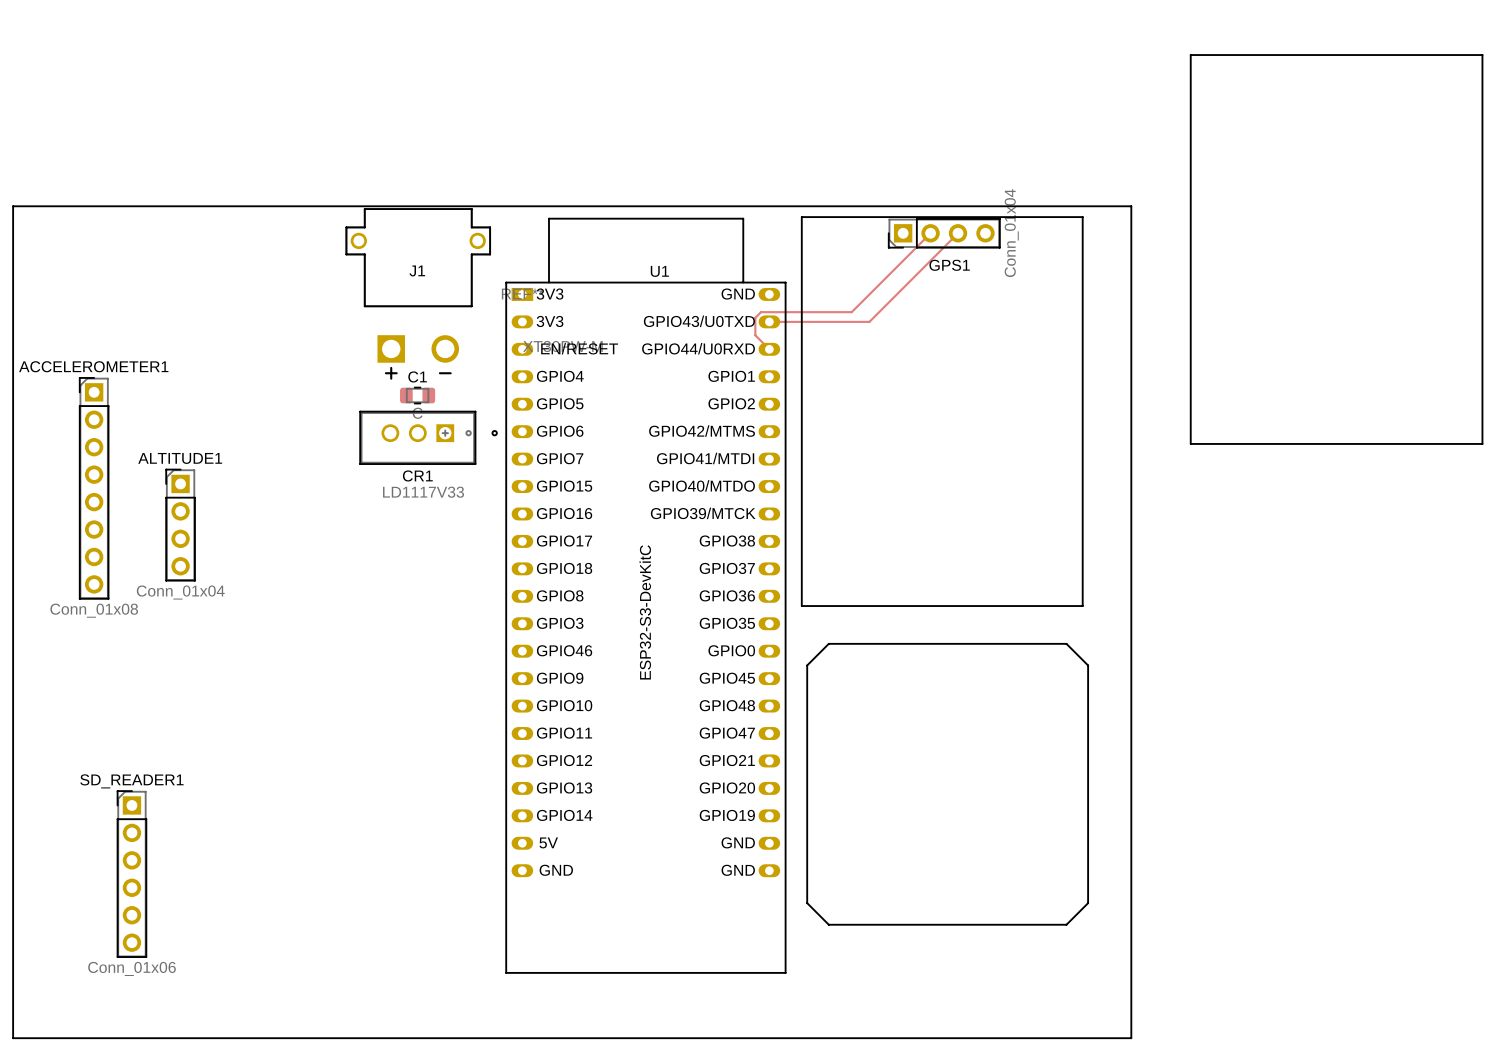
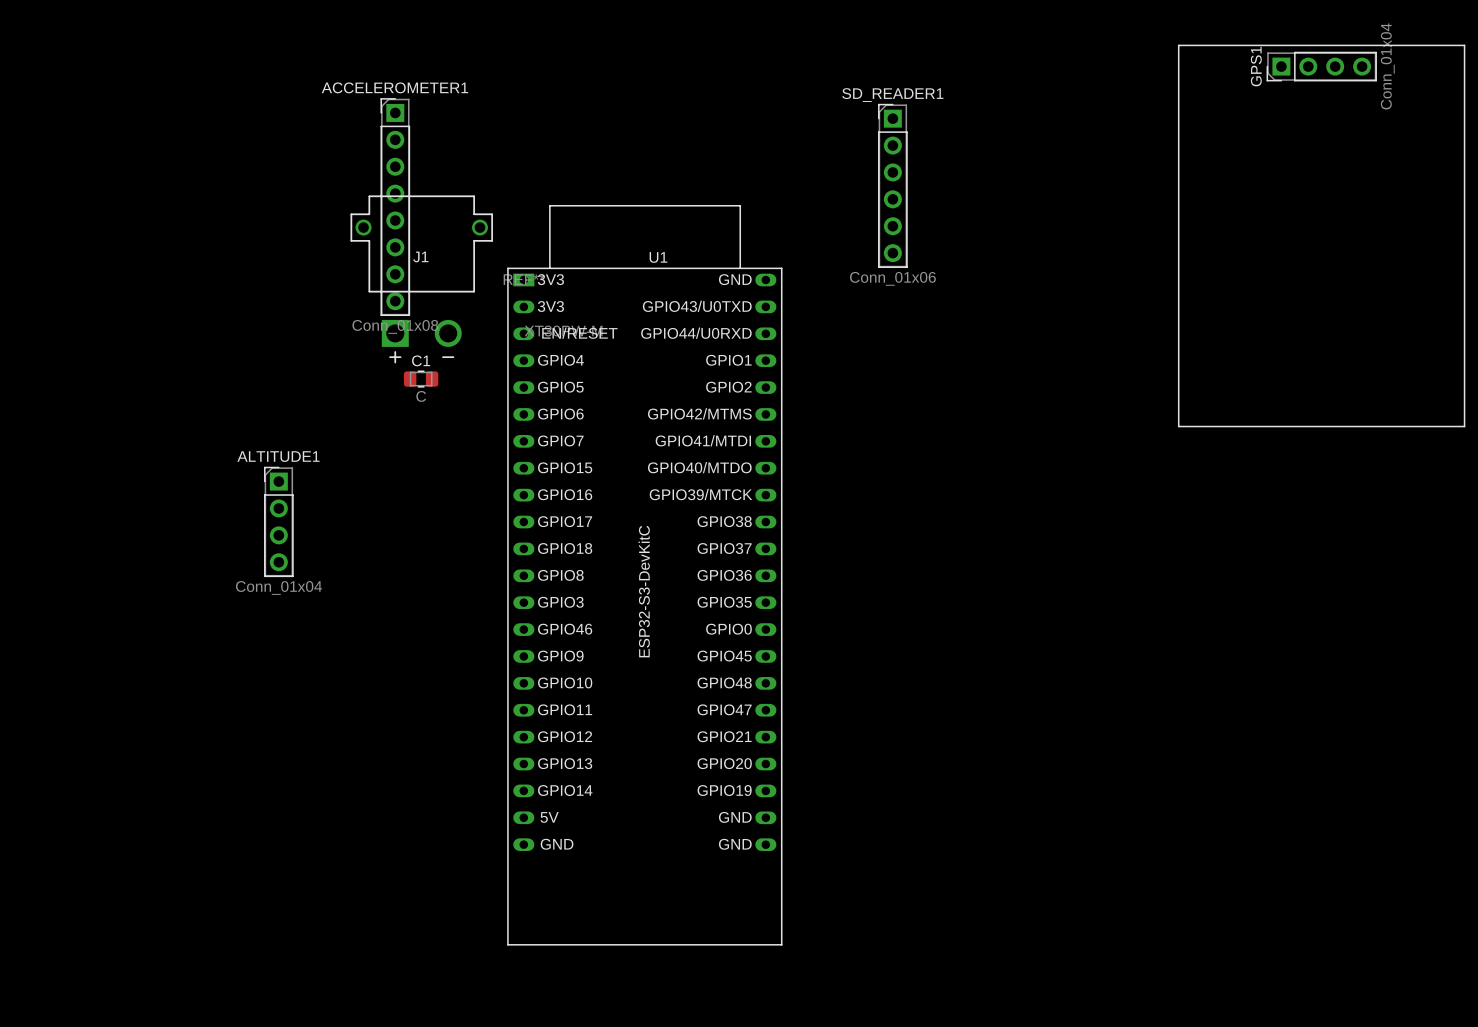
board edge: (13, 206) (1131, 206) (1131, 1038) (13, 1038) (13, 206) -> none
line: (801, 217) (1082, 217) (1082, 606) (801, 606) (801, 217) -> none
top track: (930, 233) (851, 312) (761, 312) (755, 317) (755, 335) (769, 349) -> none
GPS1 position: (944, 233) -> (1321, 66)
top track: (958, 233) (869, 321) (769, 321) -> none
GPS1 name rotation: 0° (949, 265) -> 90° counterclockwise (1256, 66)
GPS1 name position: GPS1 (949, 265) -> GPS1 (1256, 66)
CR1: LD1117V33 (428, 437) -> none
ACCELEROMETER1 position: (94, 488) -> (395, 207)
ALTITUDE1 position: (180, 525) -> (278, 521)
board edge: (828, 643) (807, 665) (807, 903) (828, 924) (1066, 924) (1088, 903) (1088, 665) (1066, 643) (828, 643) -> none
SD_READER1 position: (131, 874) -> (892, 185)

